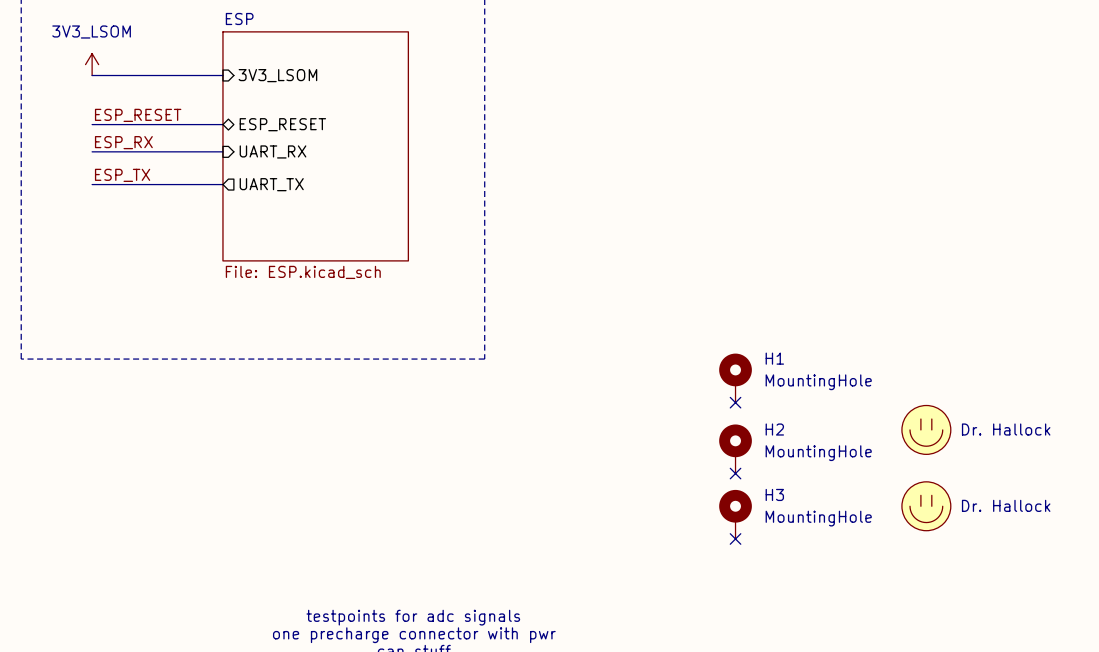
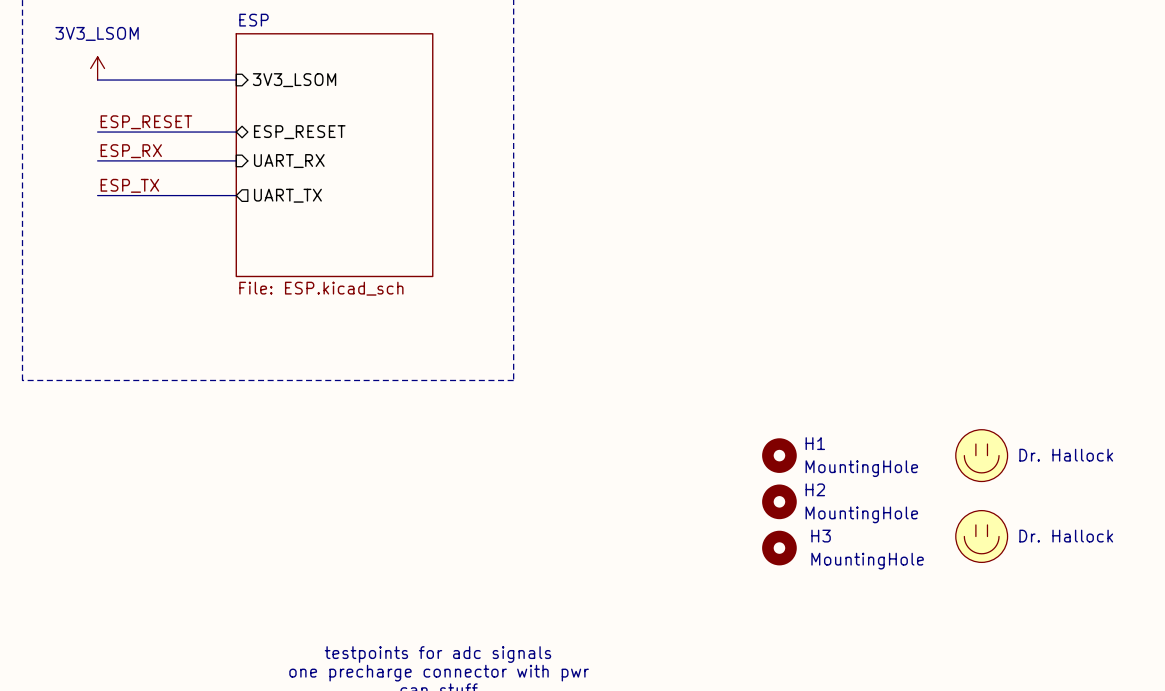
H1 symbol: [719, 353, 752, 403] -> [762, 438, 797, 473]
no-connect mark: (735, 402) -> none
H2 symbol: [719, 424, 752, 474] -> [762, 484, 797, 520]
no-connect mark: (735, 473) -> none
H3 symbol: [719, 489, 752, 539] -> [762, 530, 797, 566]
no-connect mark: (735, 538) -> none

